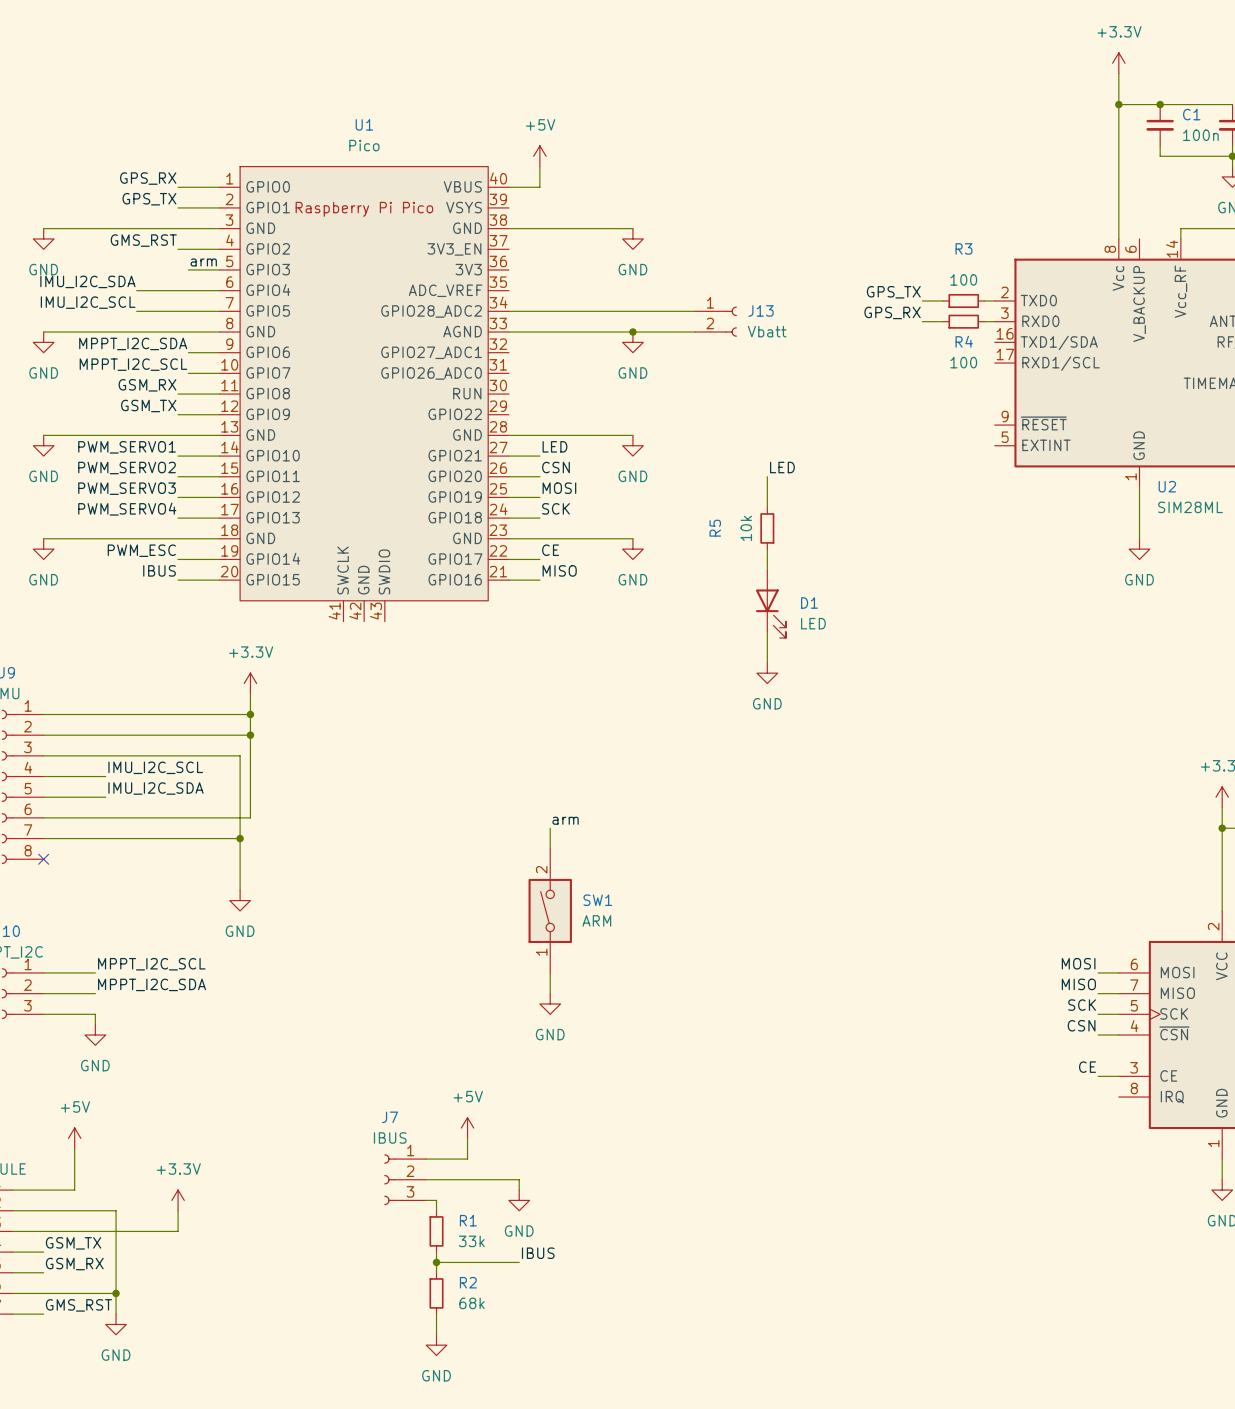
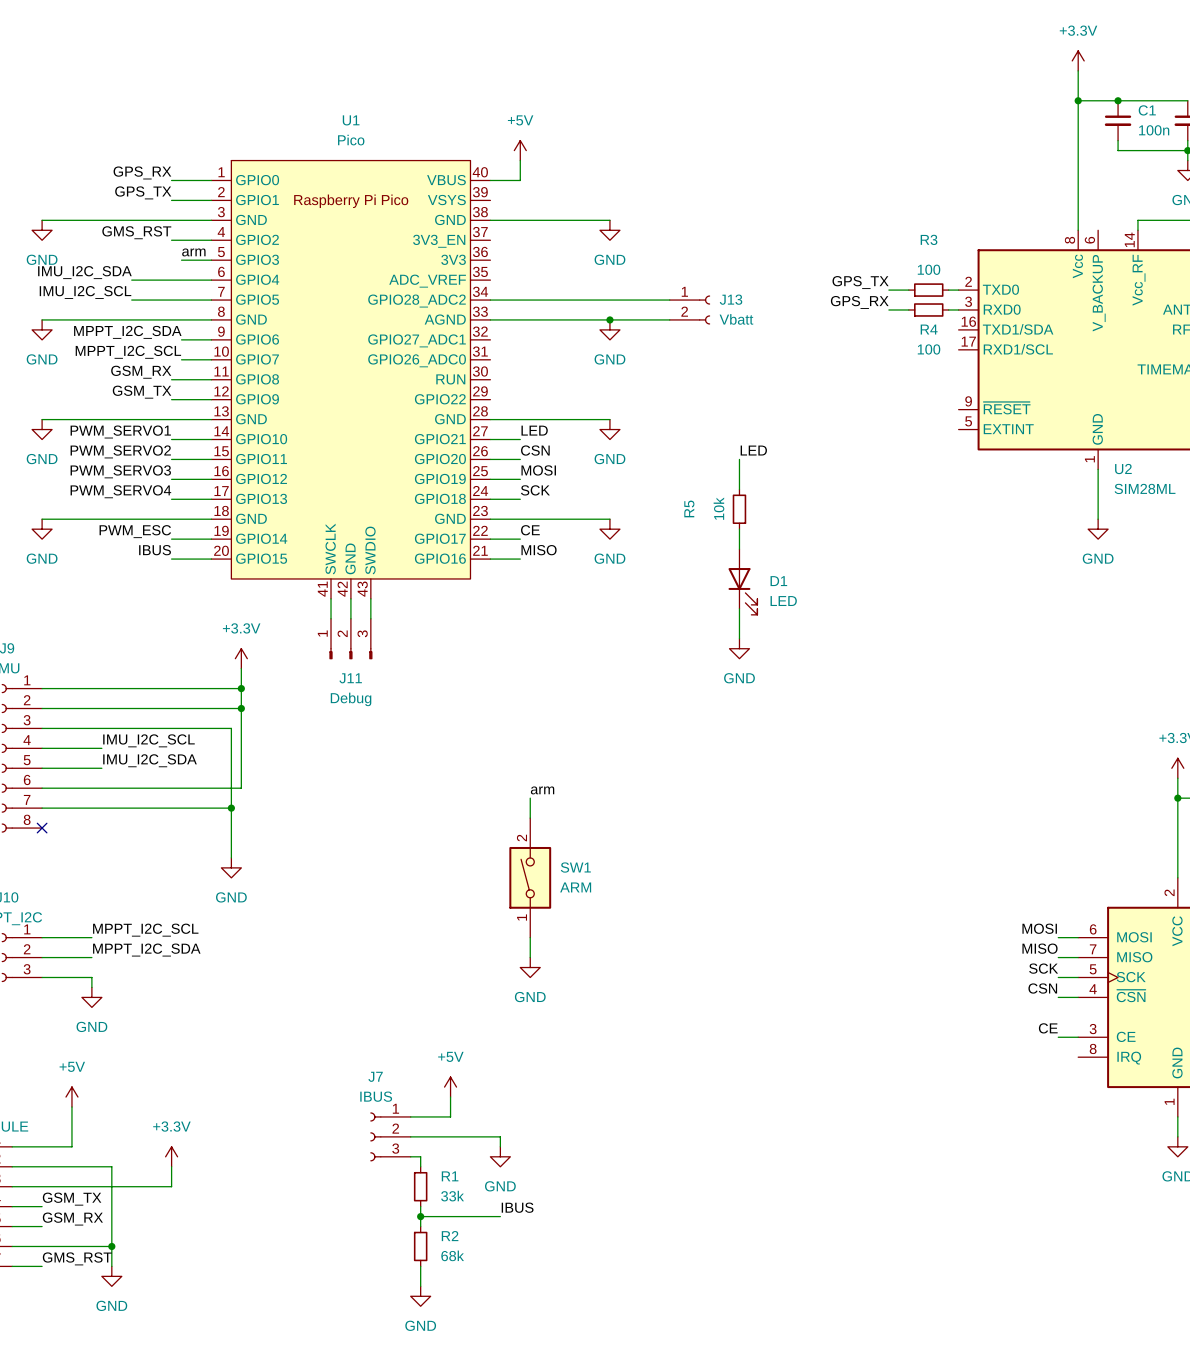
wire: none -> (331, 598) (331, 618)
wire: none -> (350, 598) (350, 618)
wire: none -> (370, 598) (370, 618)
J11: none -> Debug (350, 639)

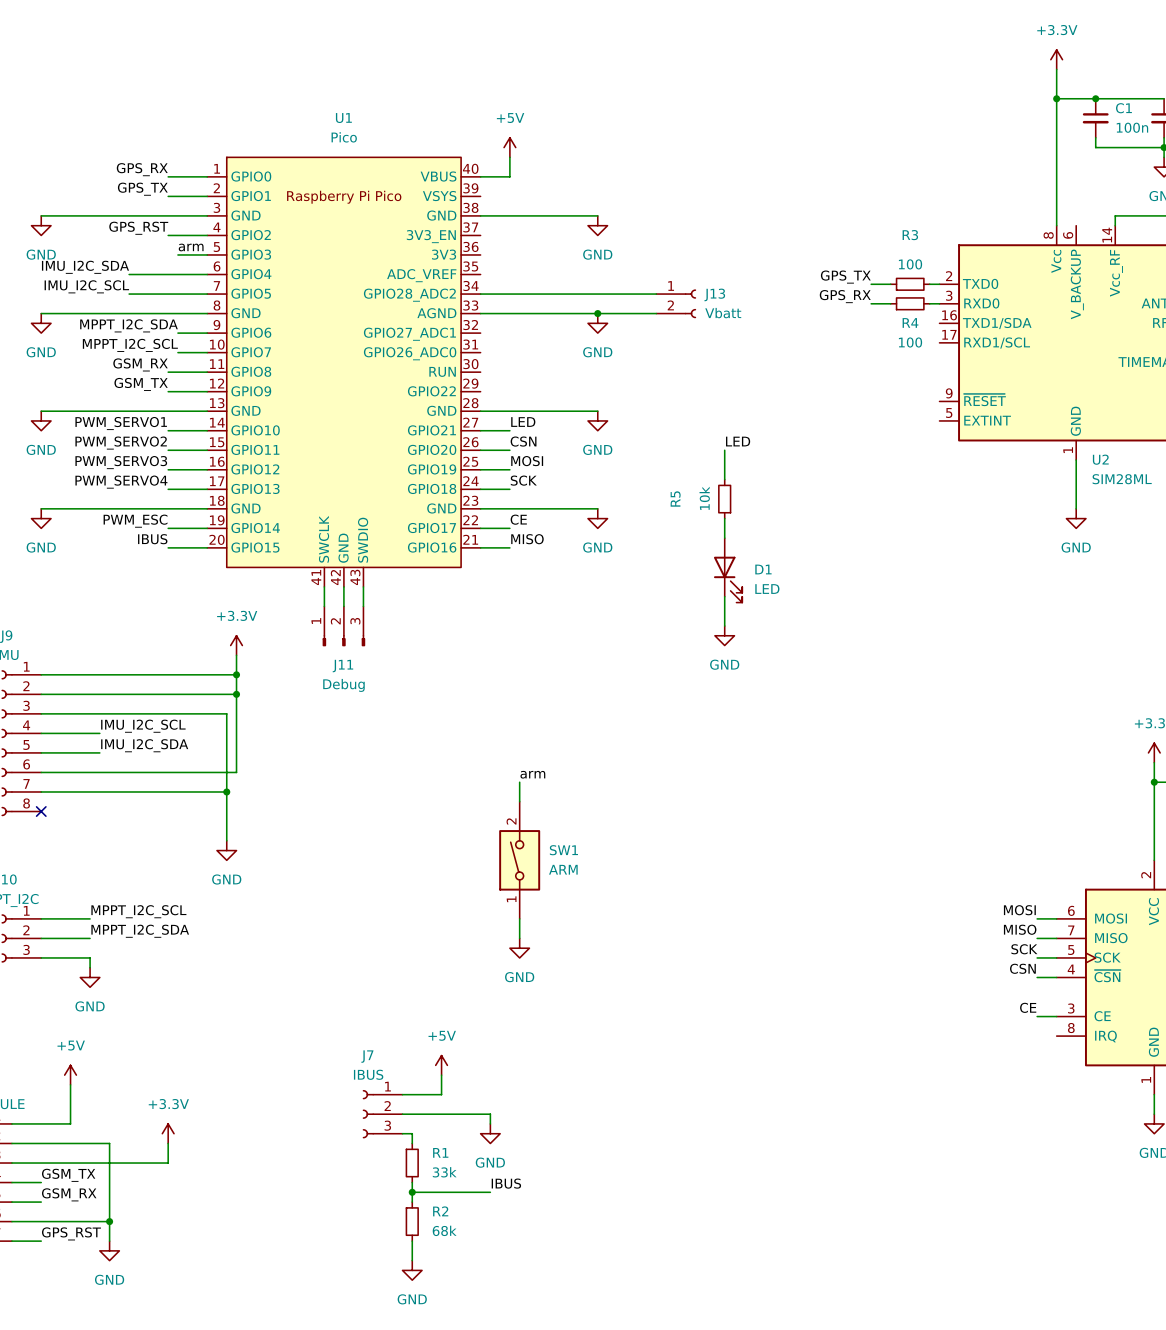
label: GMS_RST (136, 232) -> GPS_RST (138, 228)
label: GMS_RST (77, 1258) -> GPS_RST (71, 1233)

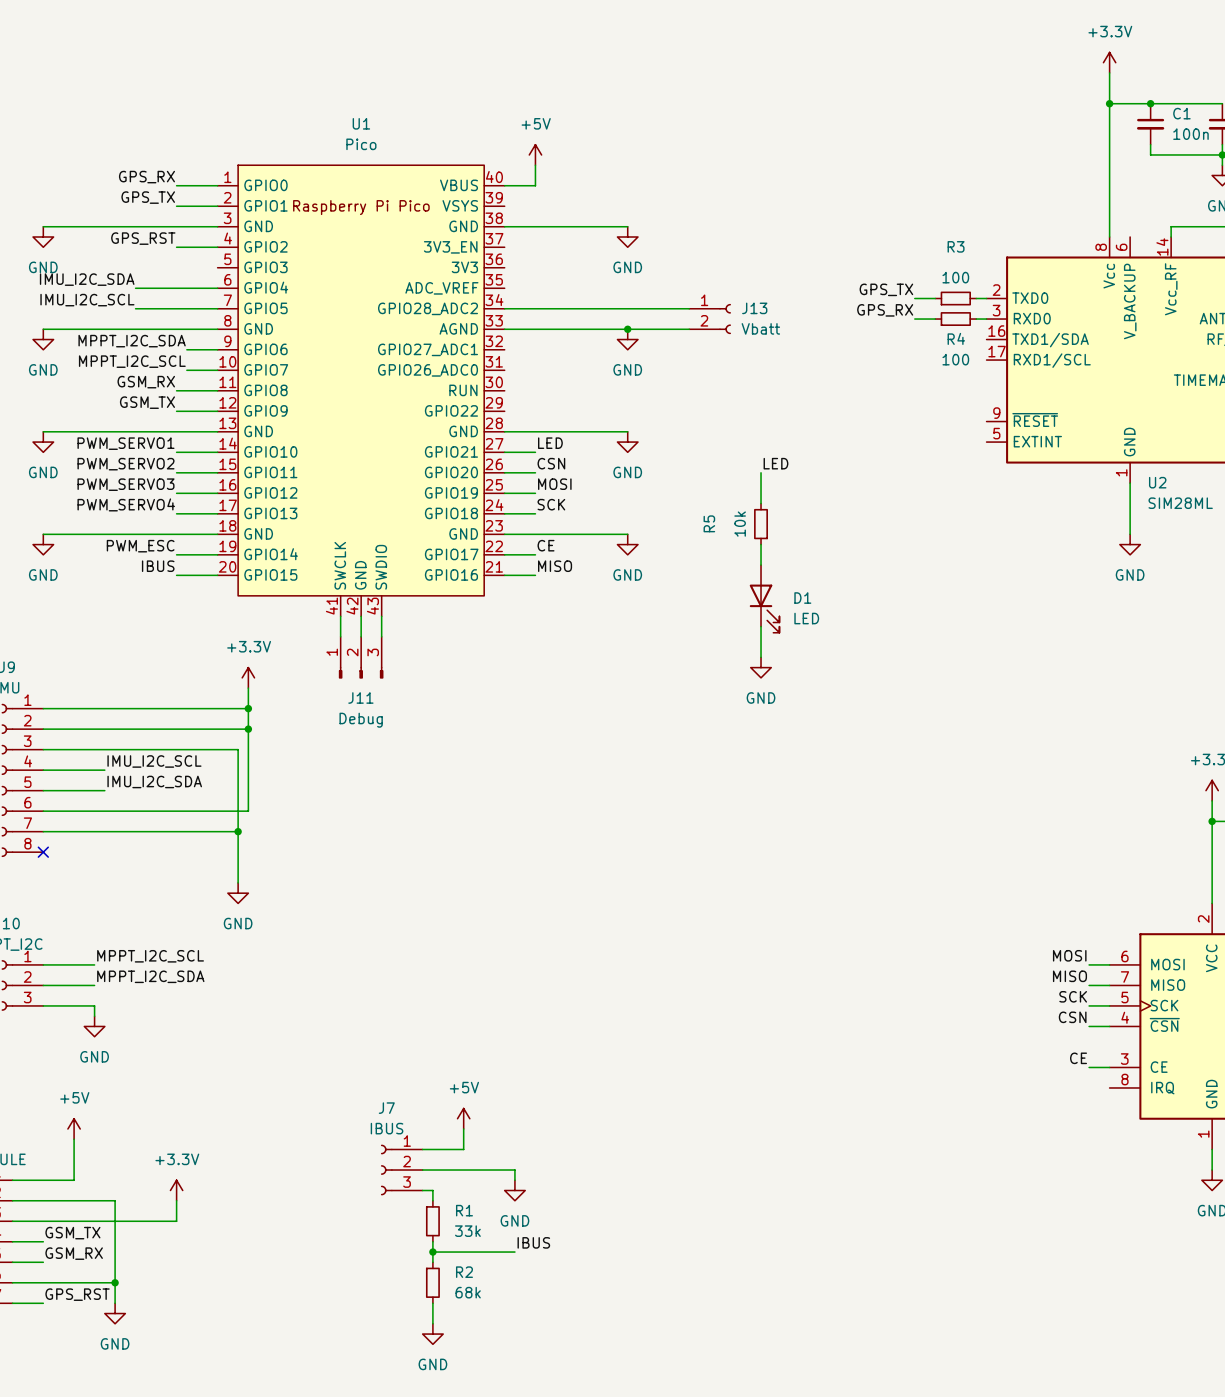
label: arm (191, 247) -> none
wire: (177, 254) (207, 254) -> none
label: arm (532, 774) -> none
wire: (519, 782) (519, 801) -> none
SW1: ARM (519, 860) -> none
wire: (519, 918) (519, 938) -> none
power symbol: GND (519, 948) -> none

